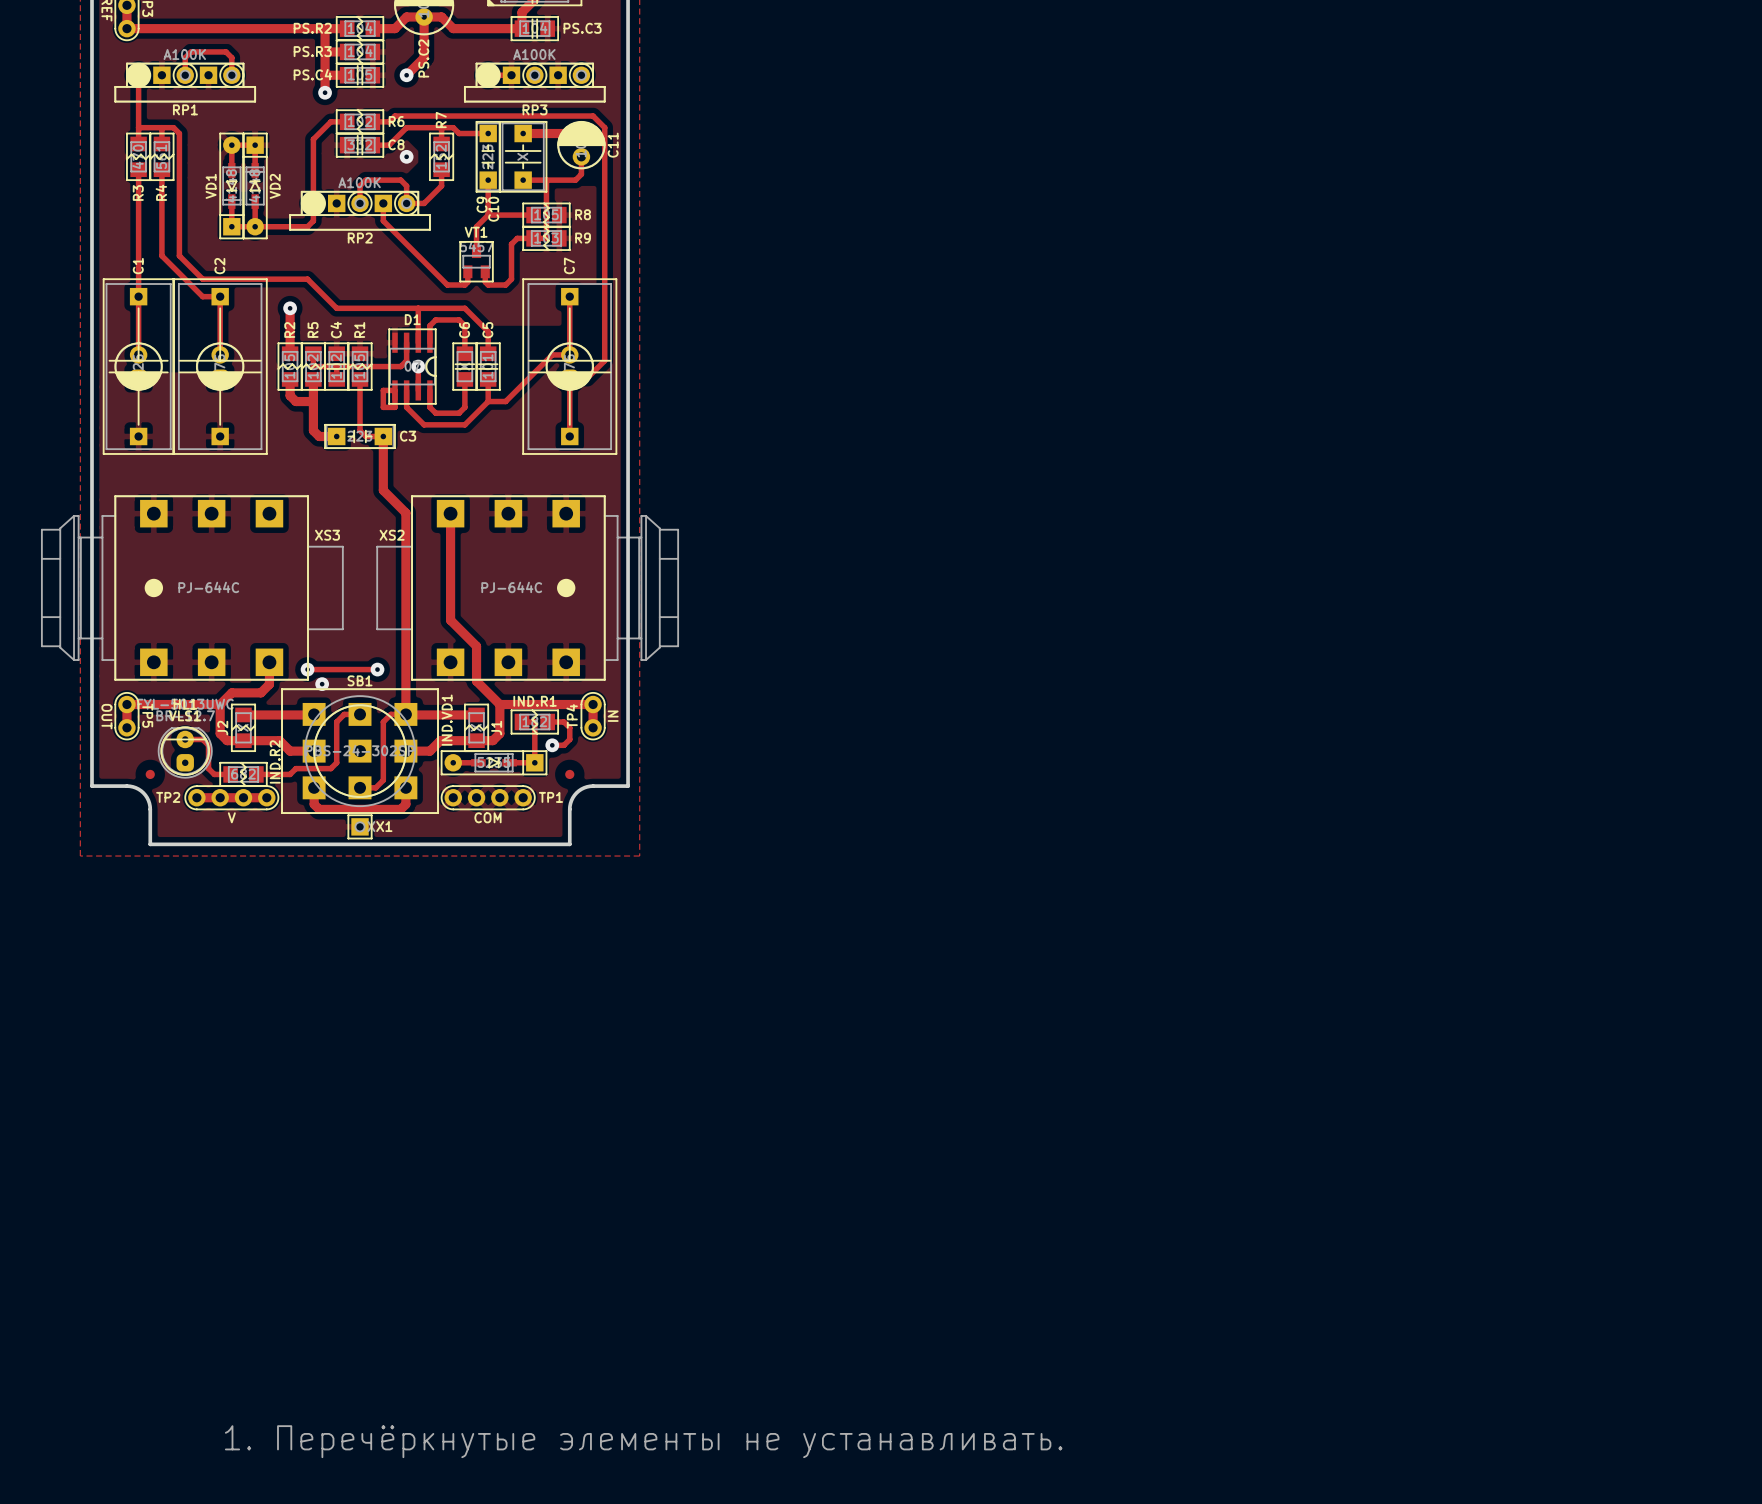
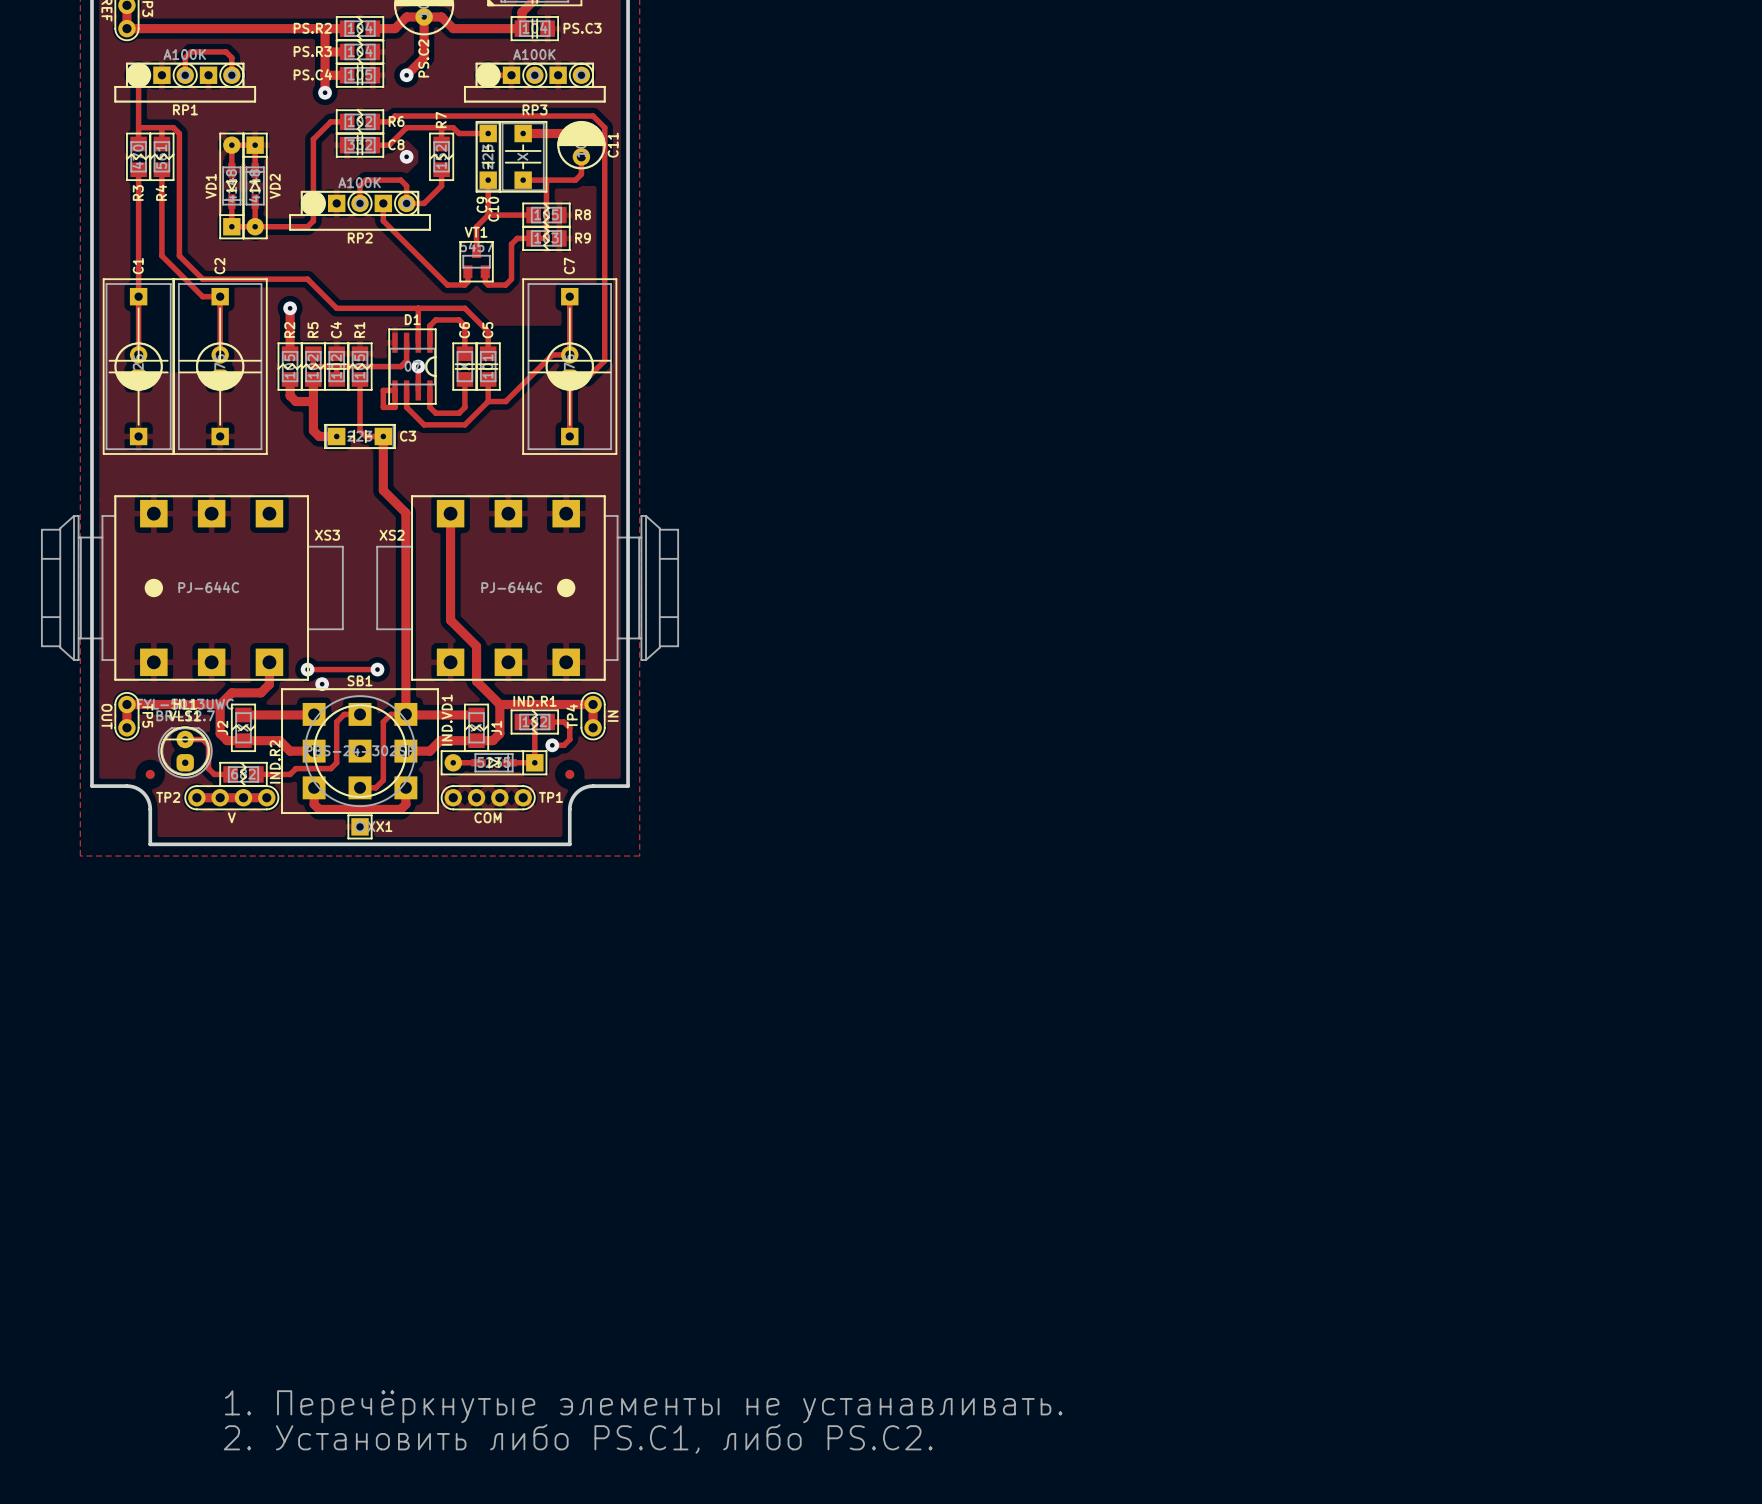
text: none -> 1. Перечёркнутые элементы не устанавливать. (643, 1406)
text: 1. Перечёркнутые элементы не устанавливать. (643, 1441) -> 2. Установить либо PS.C1, либо PS.C2. (578, 1438)

